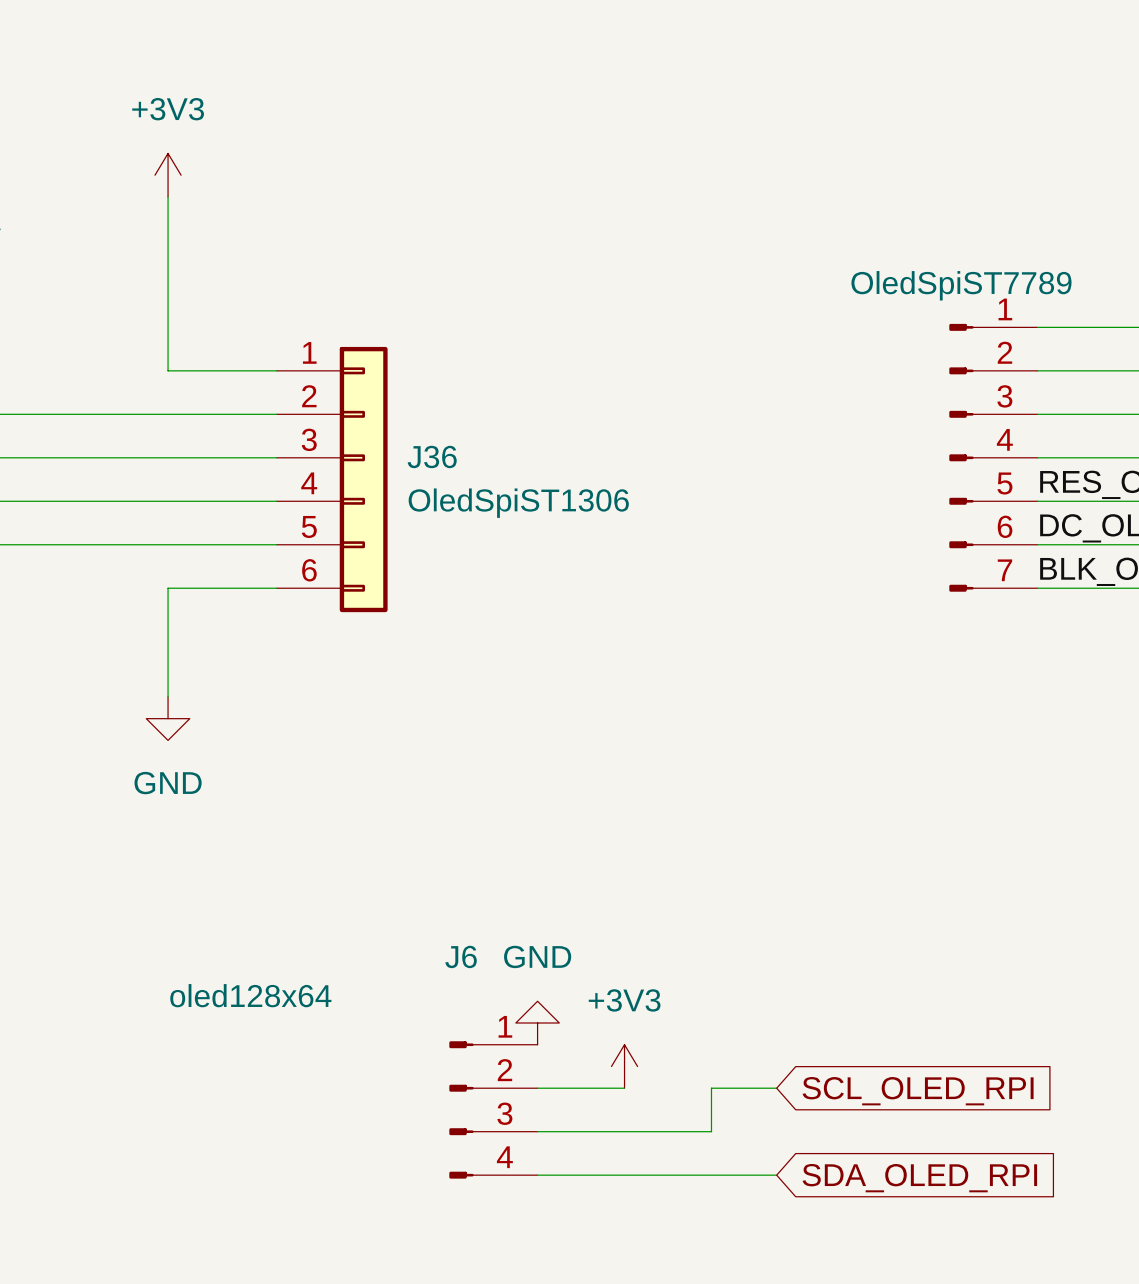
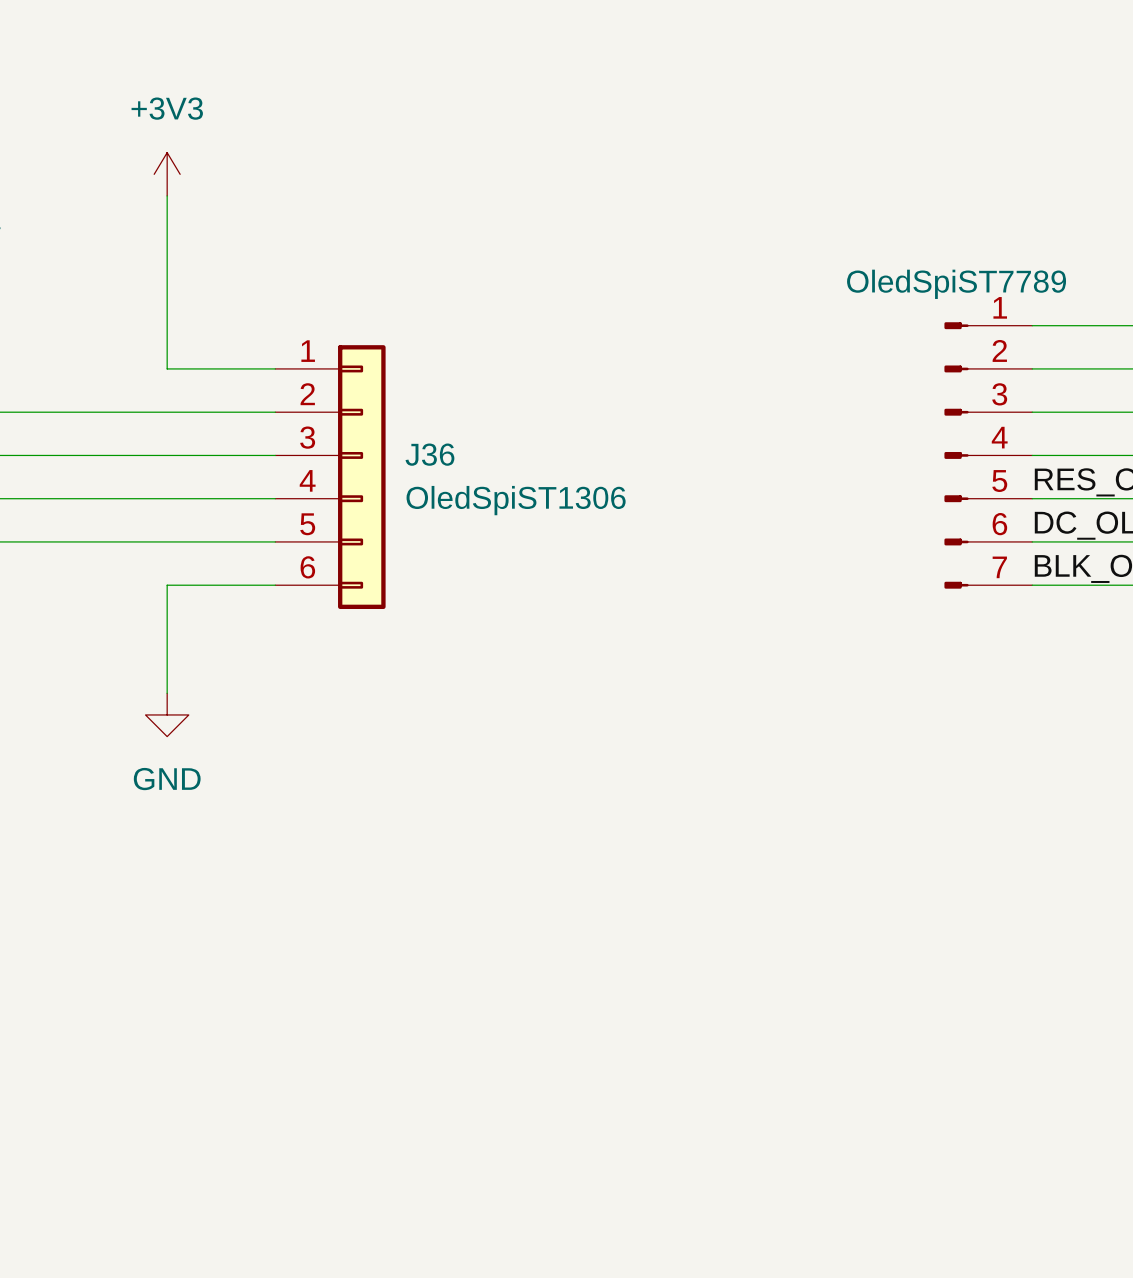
power symbol: GND (537, 1023) -> none
power symbol: +3V3 (624, 1066) -> none
wire: (537, 1088) (624, 1088) -> none
wire: (776, 1088) (711, 1088) (711, 1131) (537, 1131) -> none
global label: SCL_OLED_RPI (918, 1091) -> none
J6: oled128x64 (493, 1109) -> none
wire: (537, 1175) (776, 1175) -> none
global label: SDA_OLED_RPI (919, 1178) -> none

